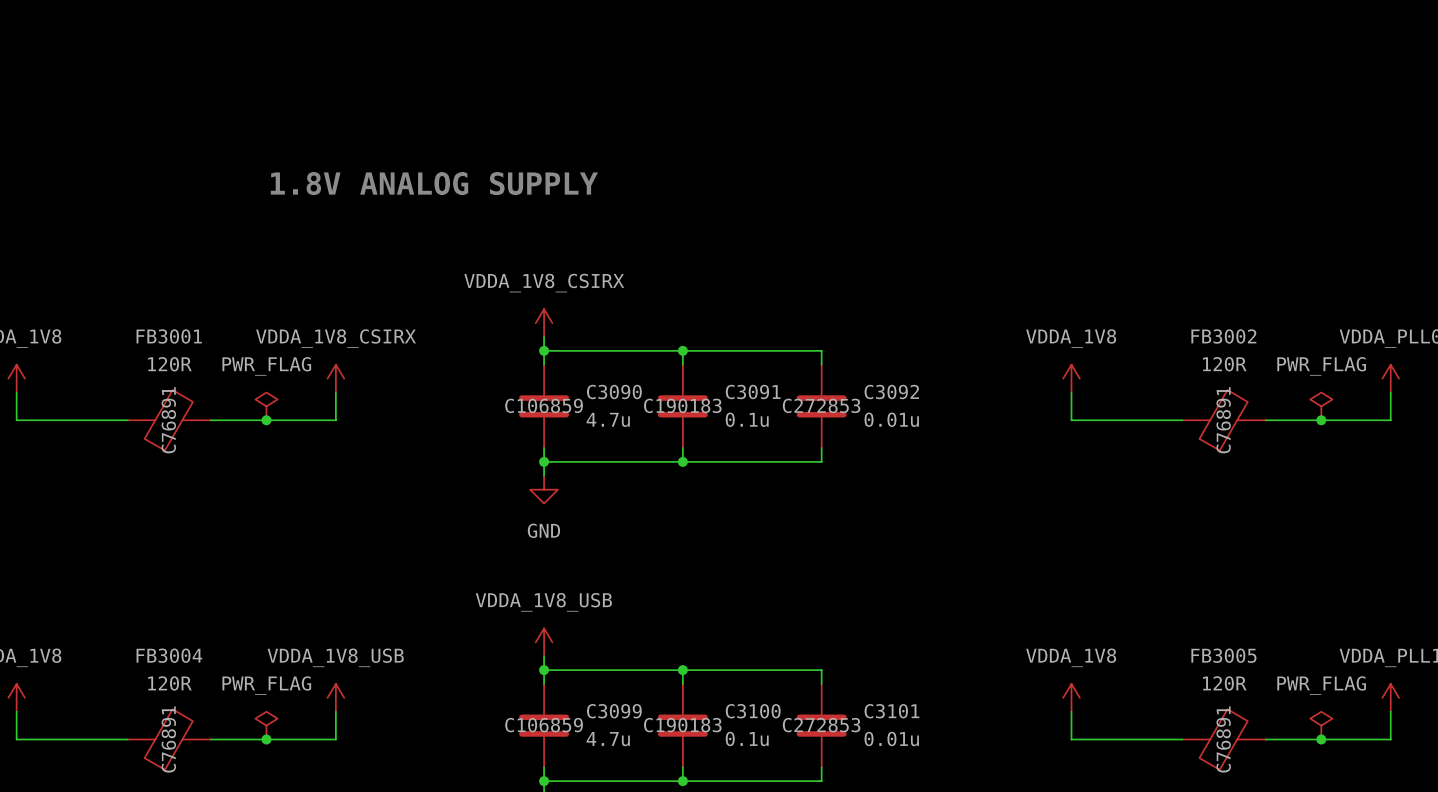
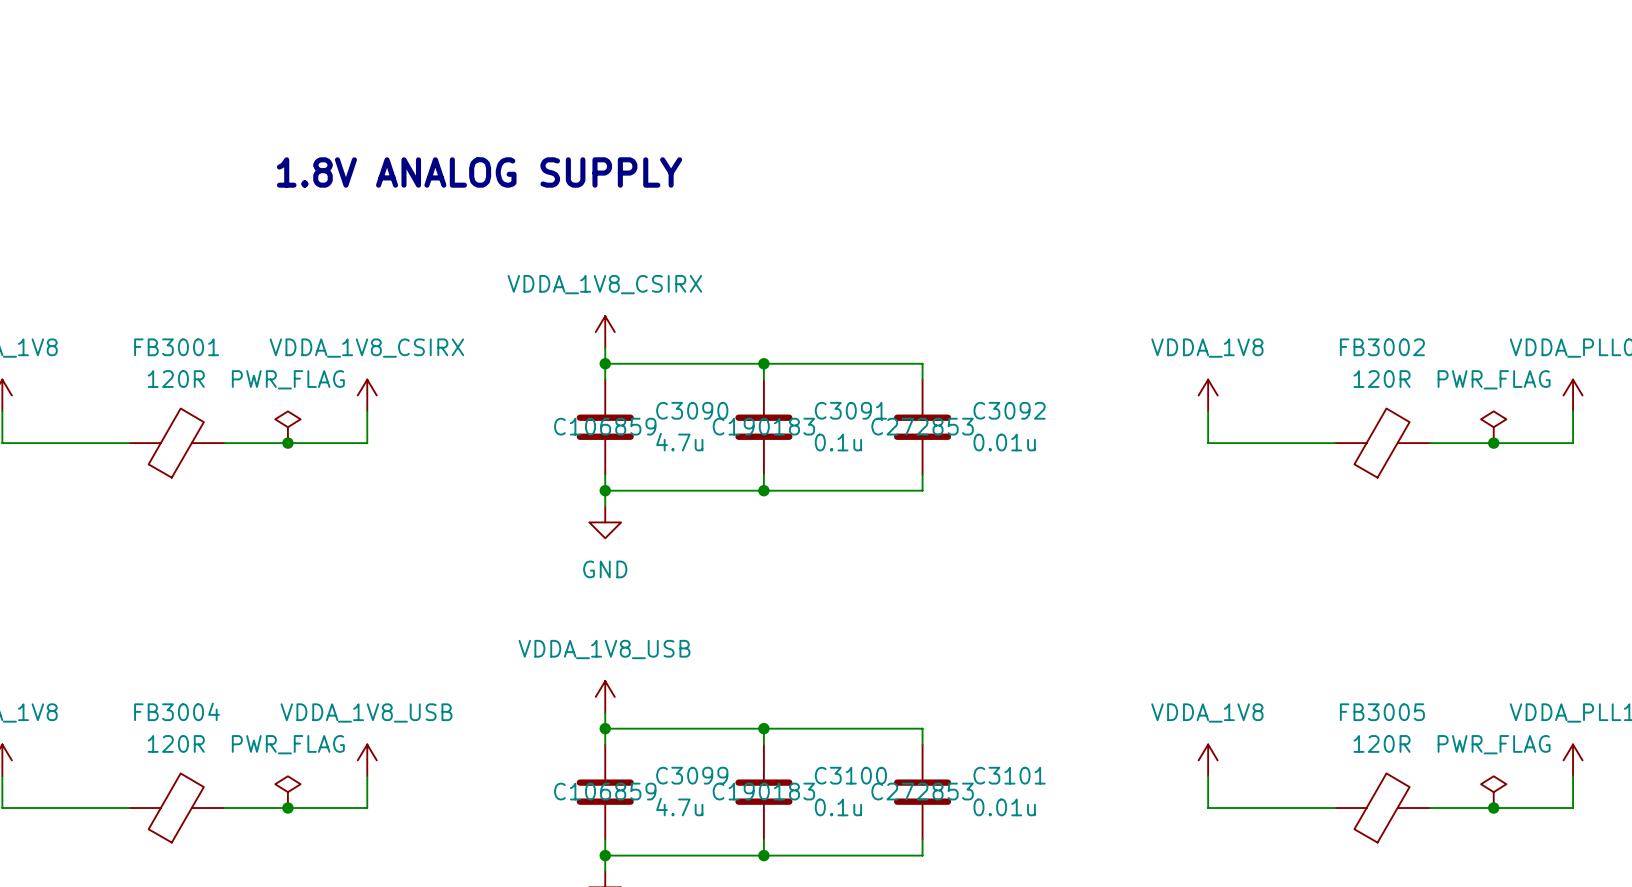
FB3001 text: C76891 (168, 420) -> none
FB3002 text: C76891 (1223, 420) -> none
FB3004 text: C76891 (168, 739) -> none
FB3005 text: C76891 (1223, 739) -> none

